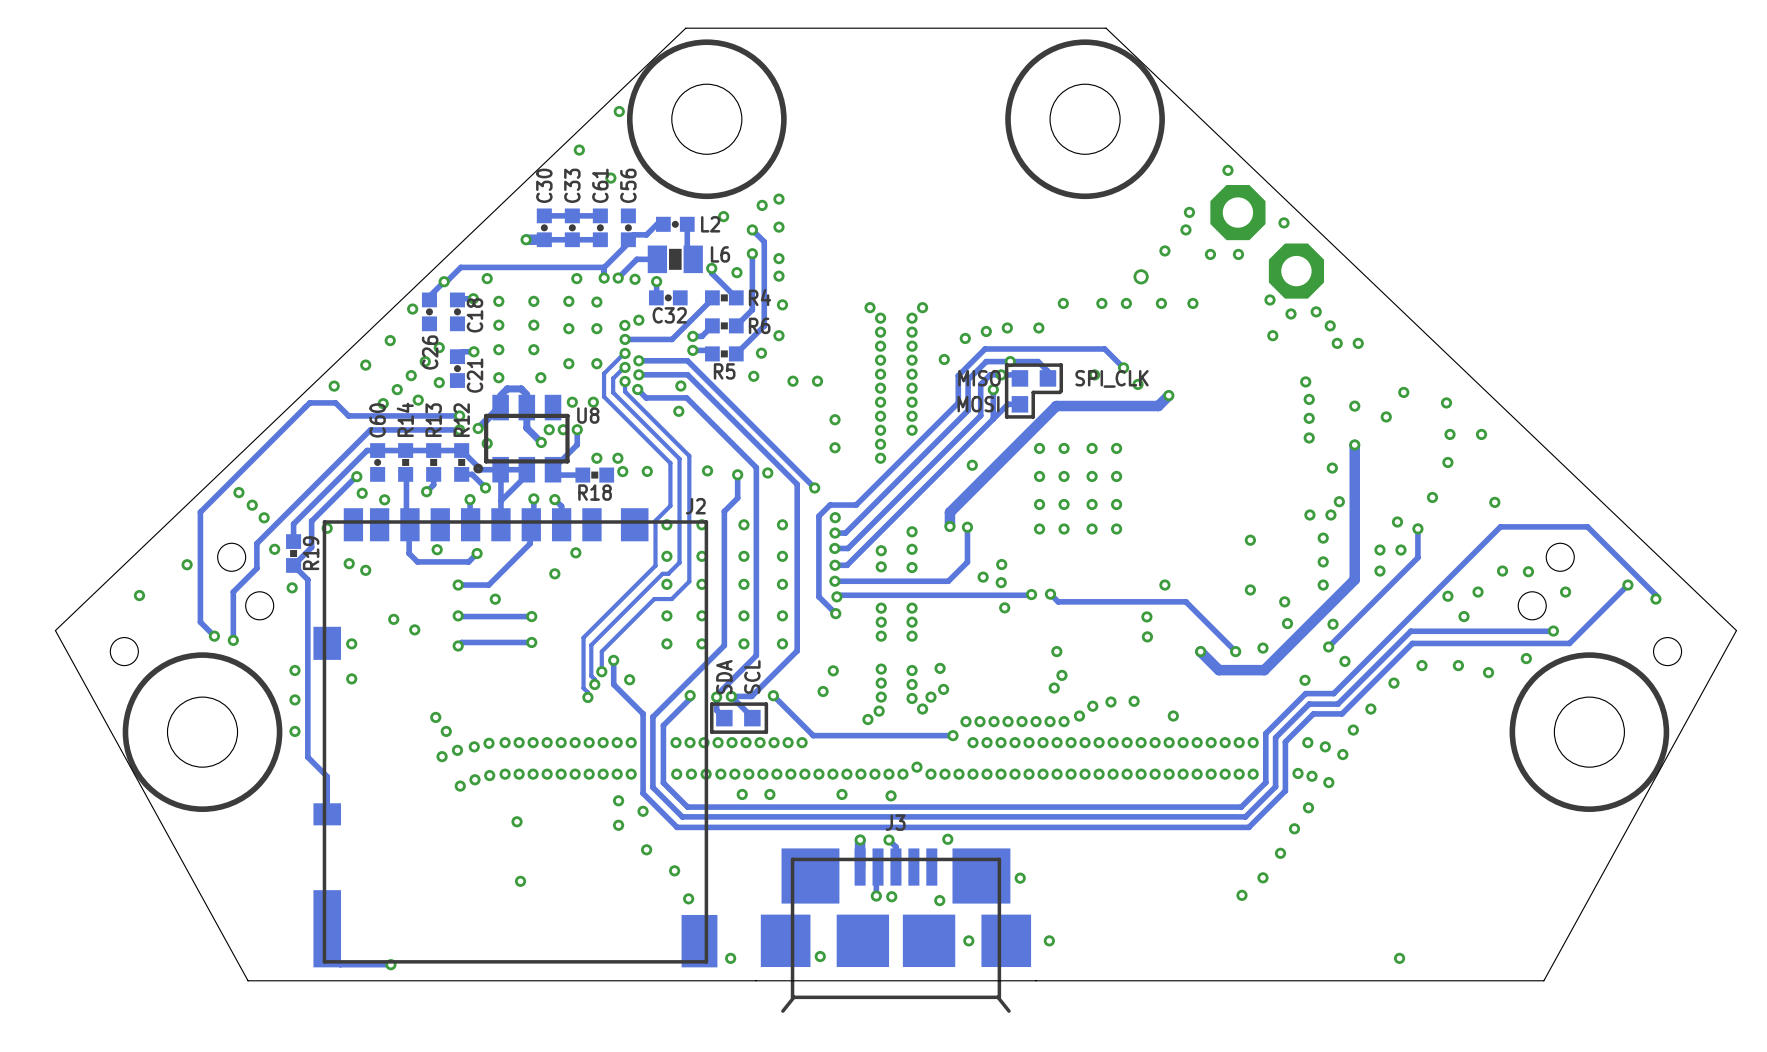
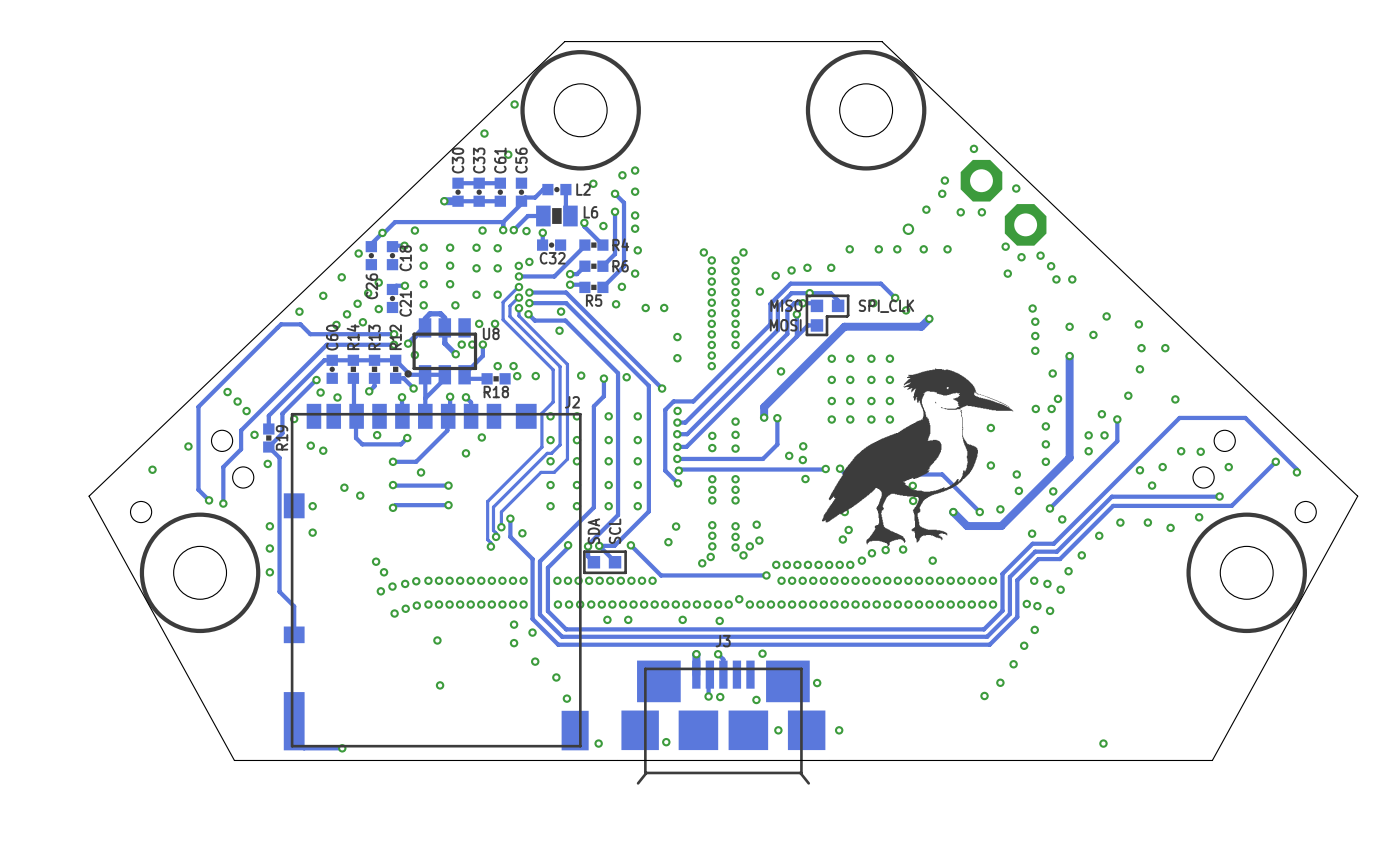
drawing: none -> [821, 368, 1014, 547]

